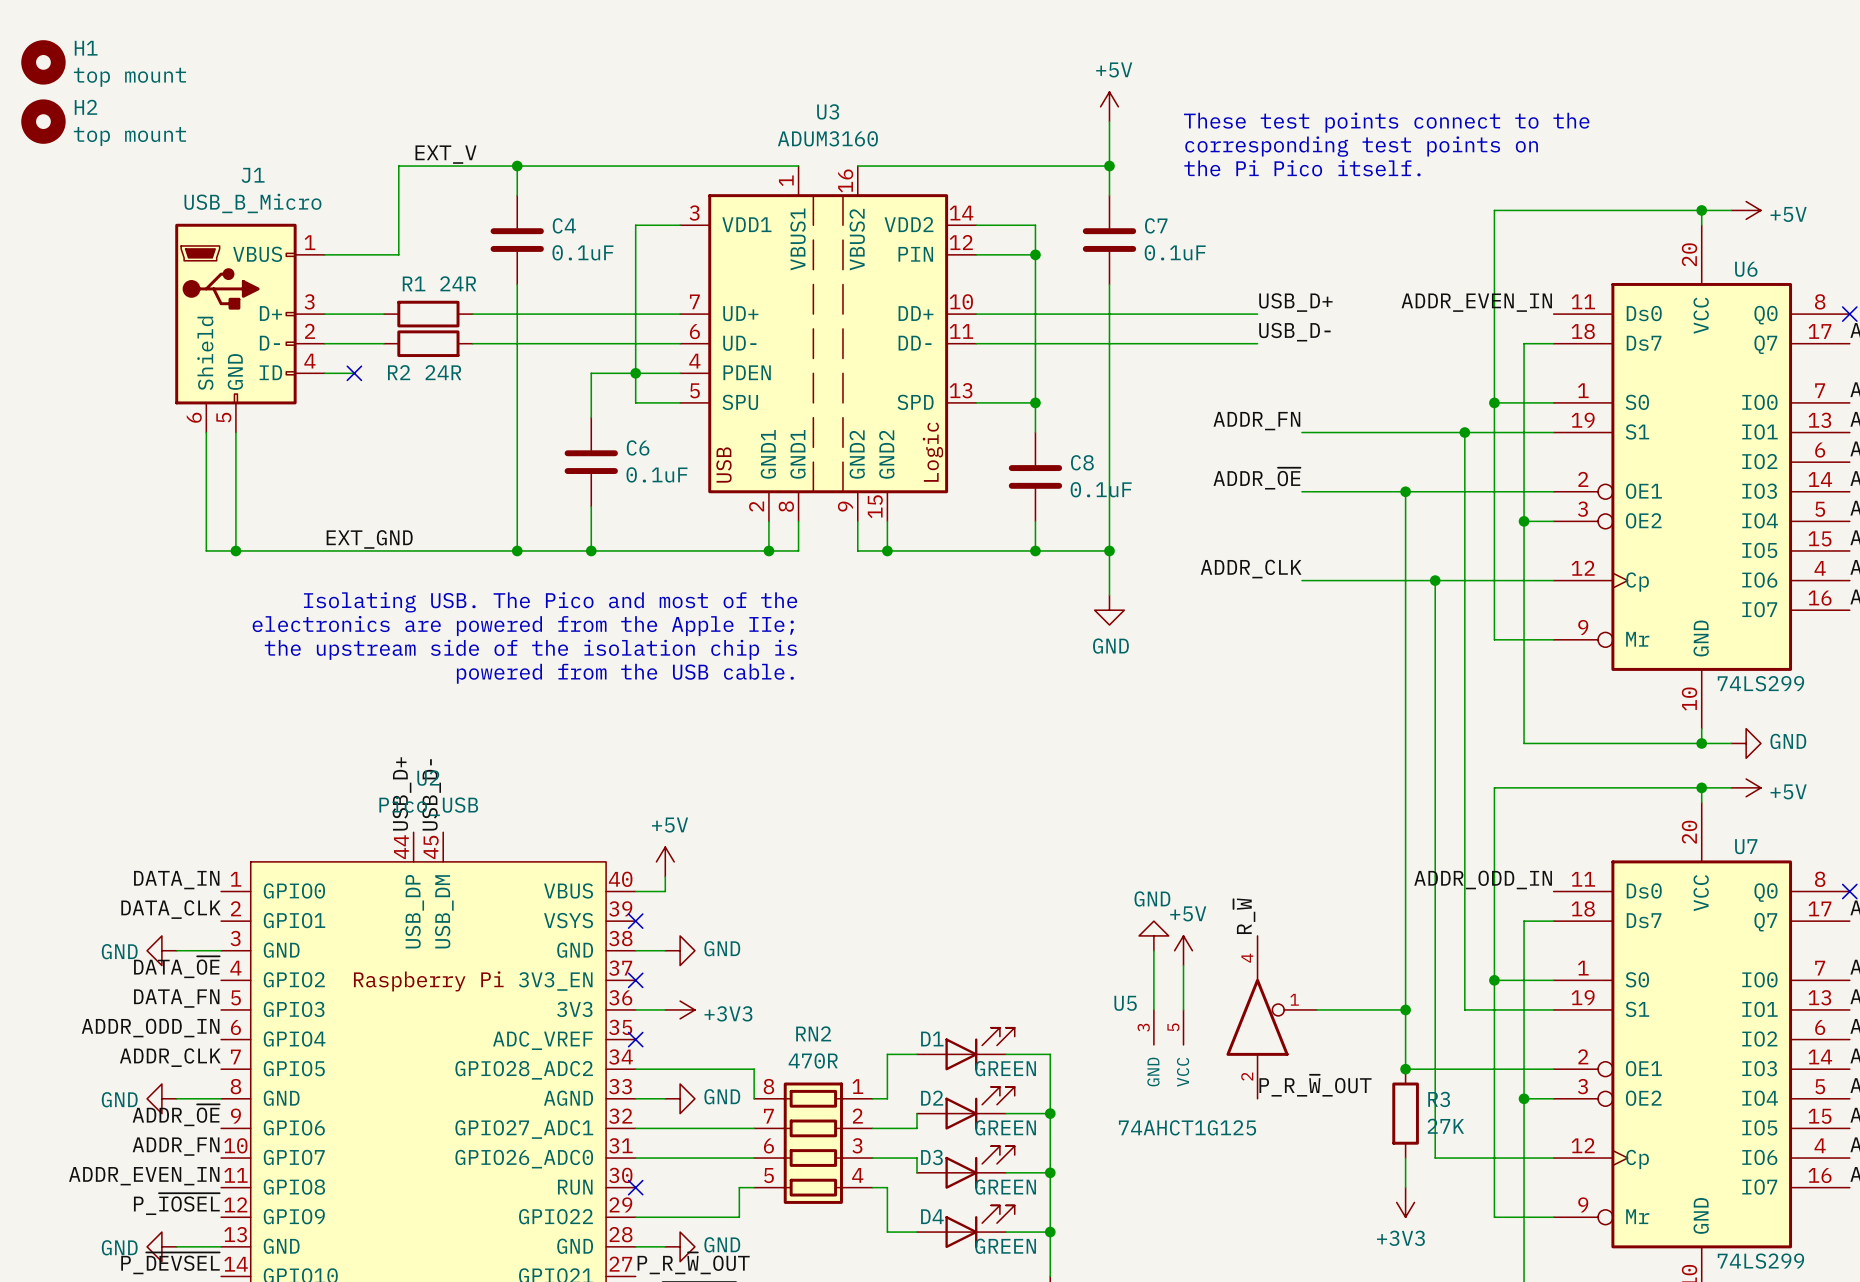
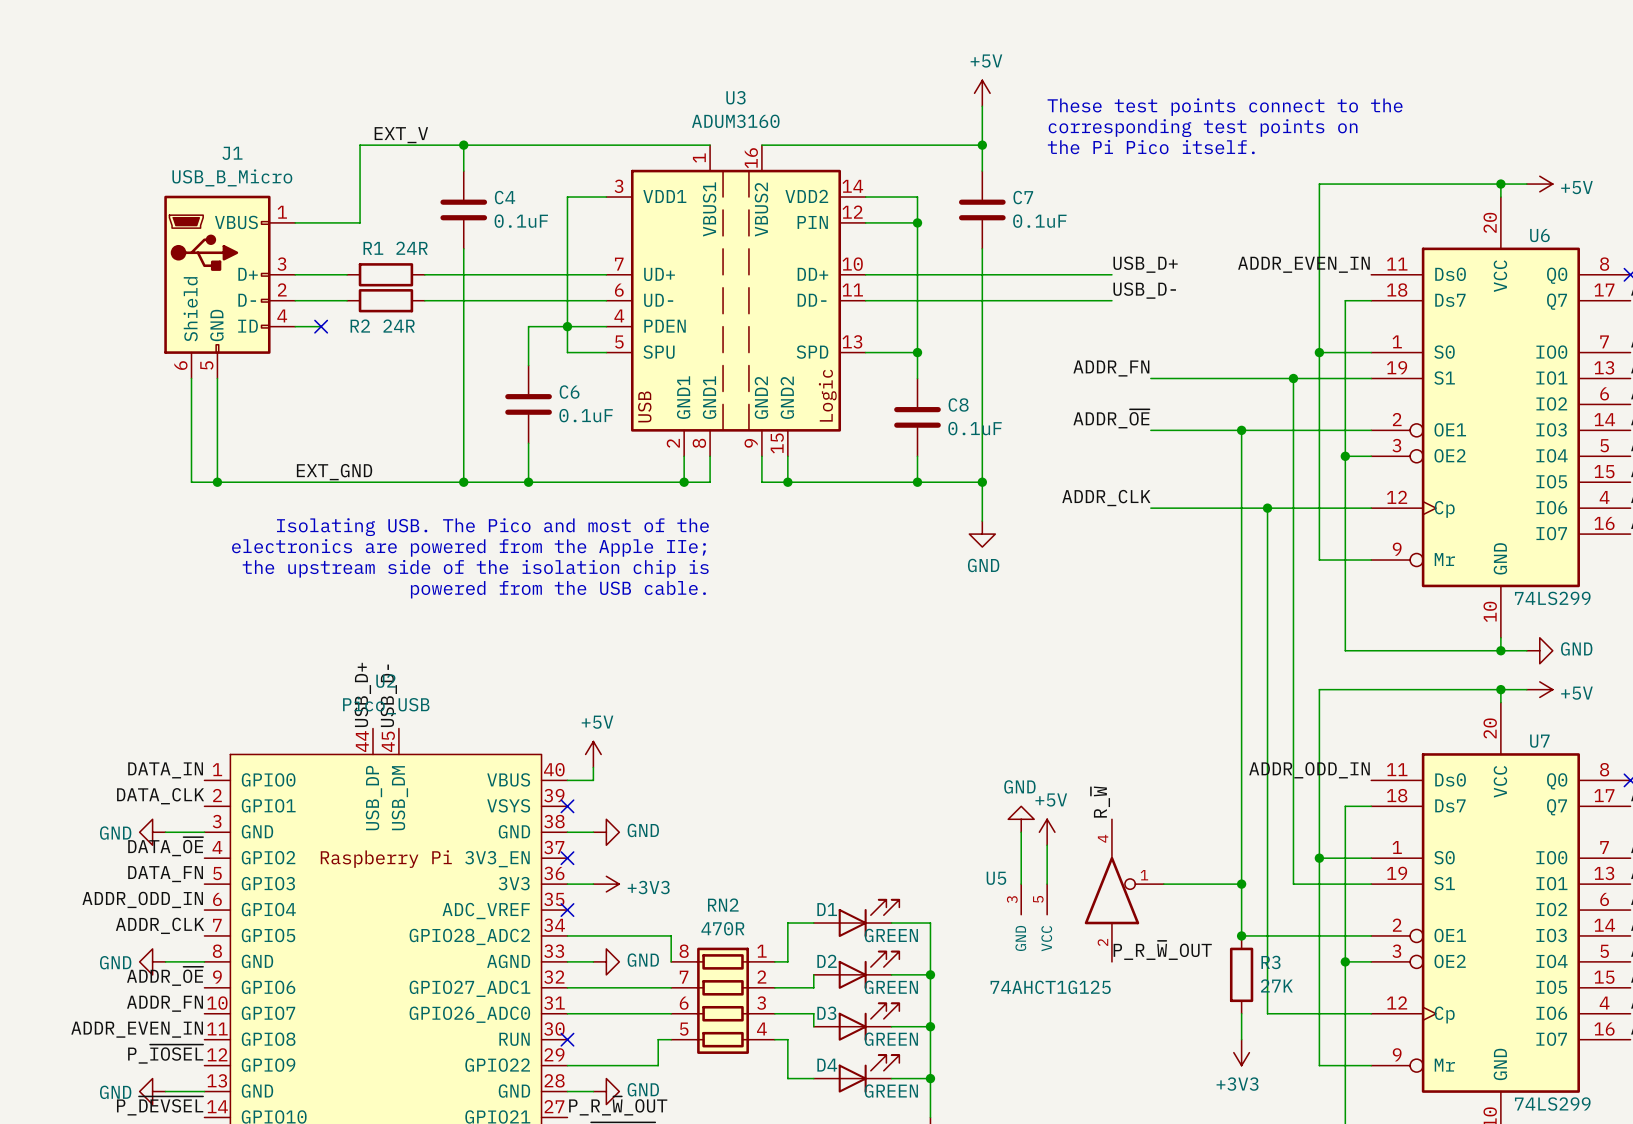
H1: top mount (43, 62) -> none
H2: top mount (43, 121) -> none

